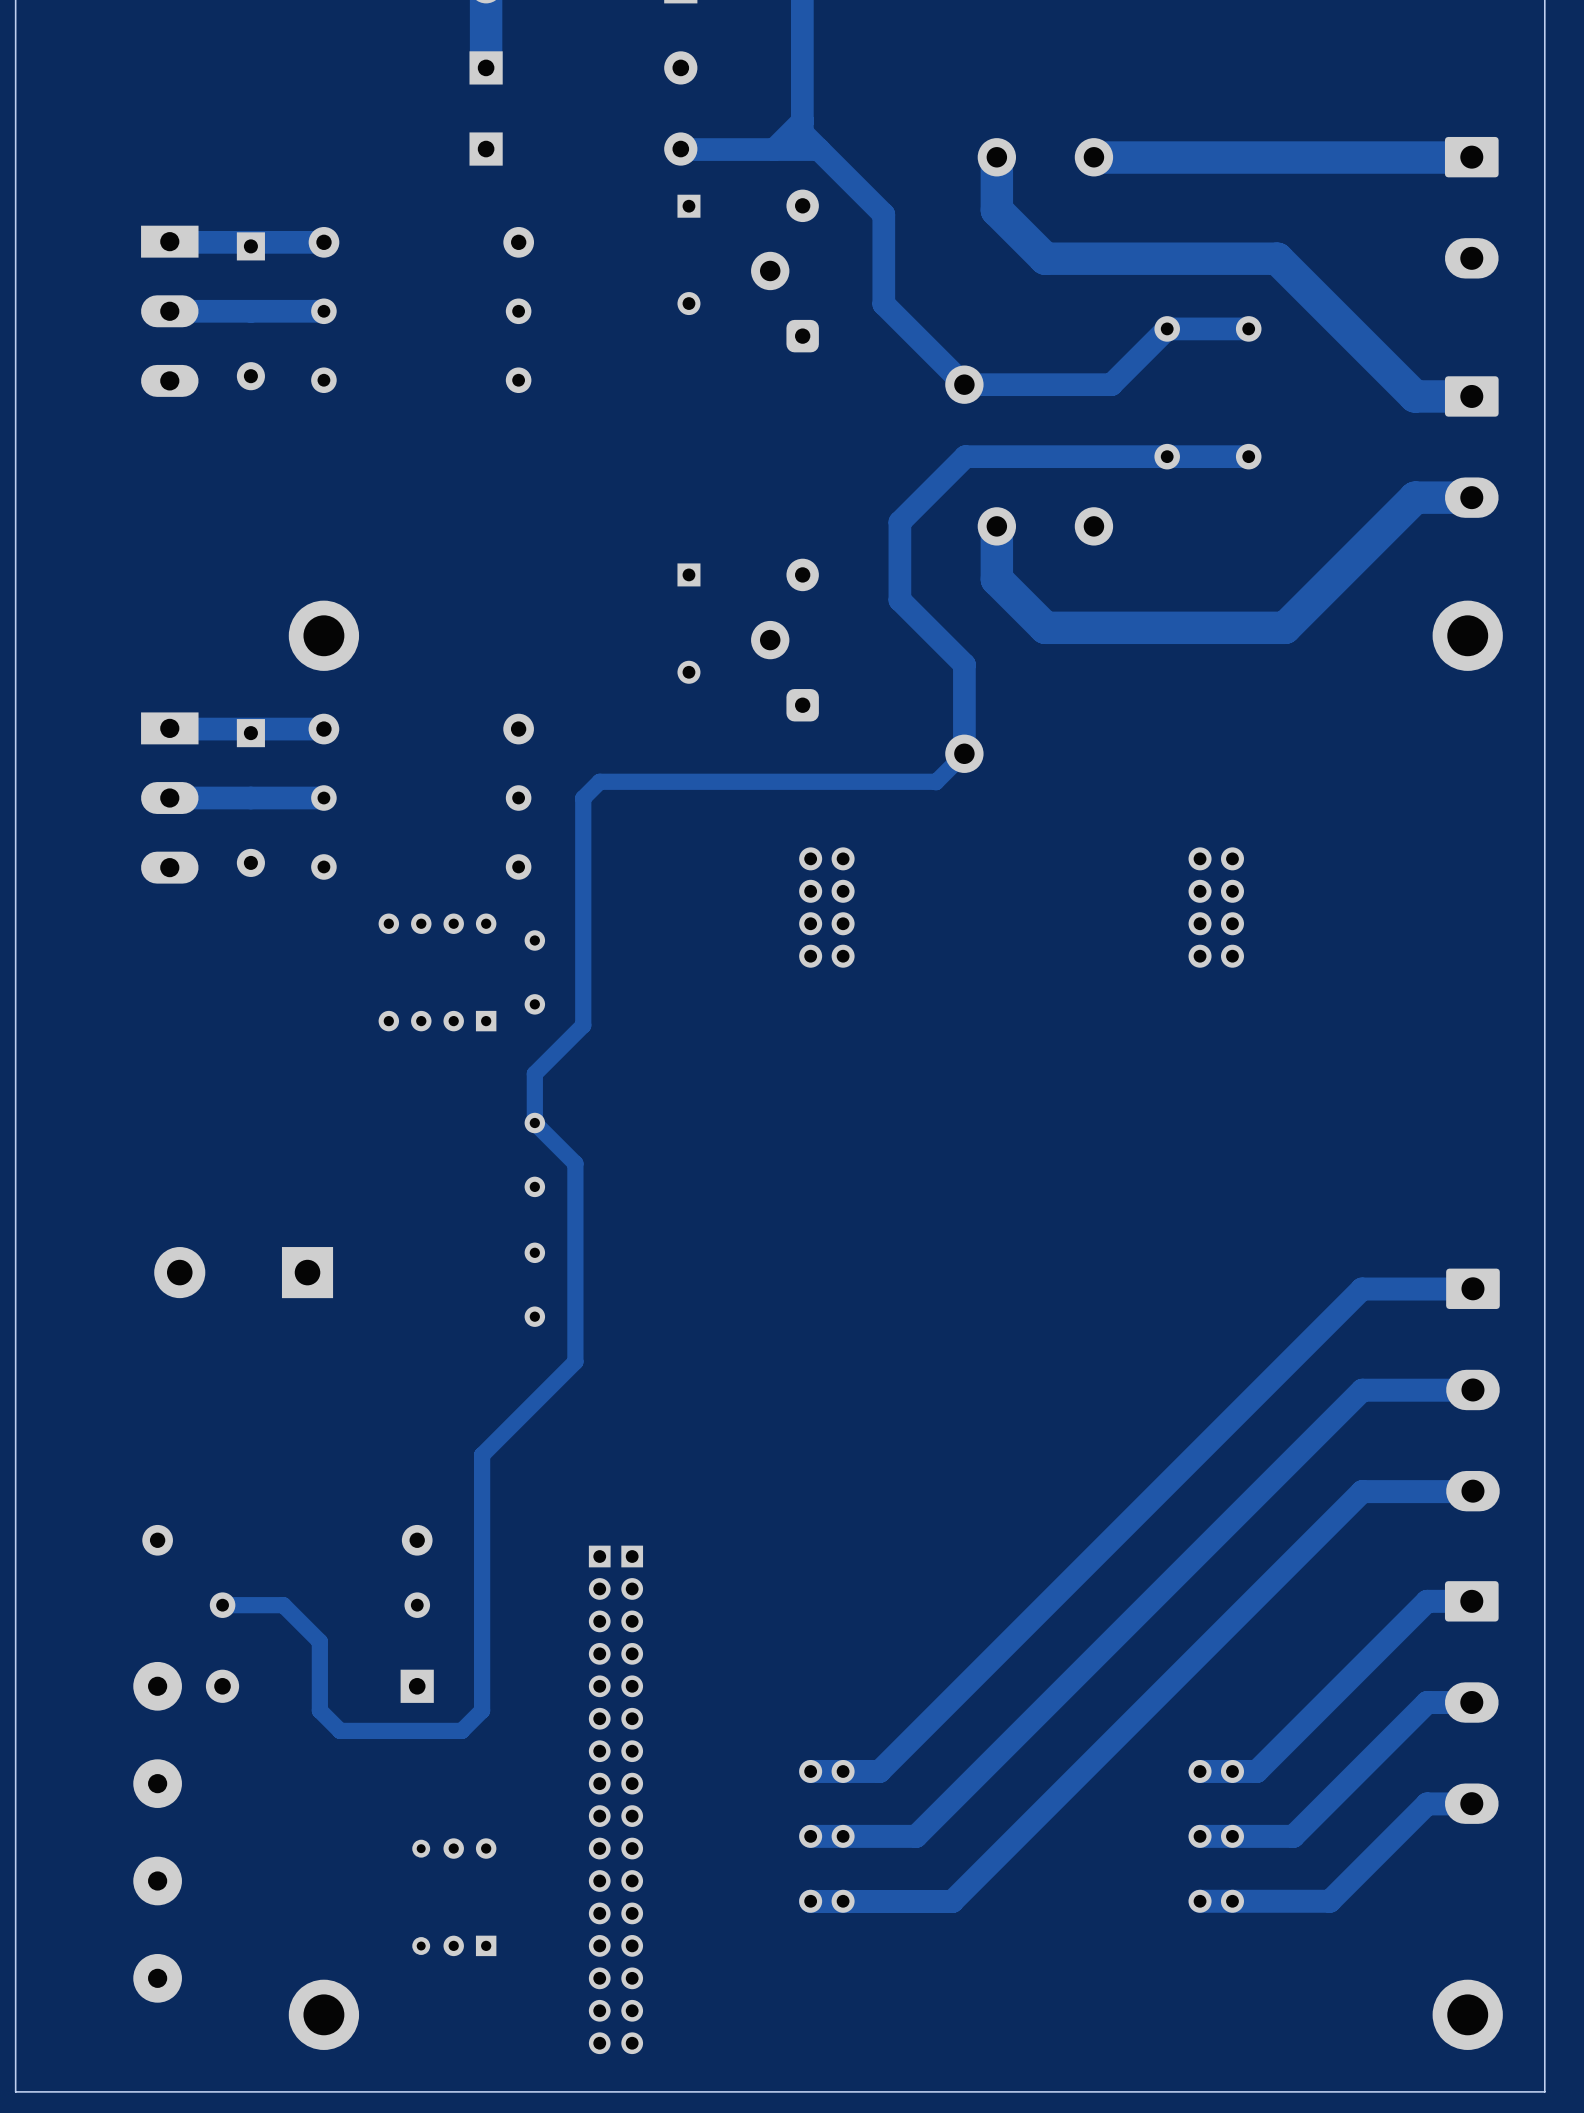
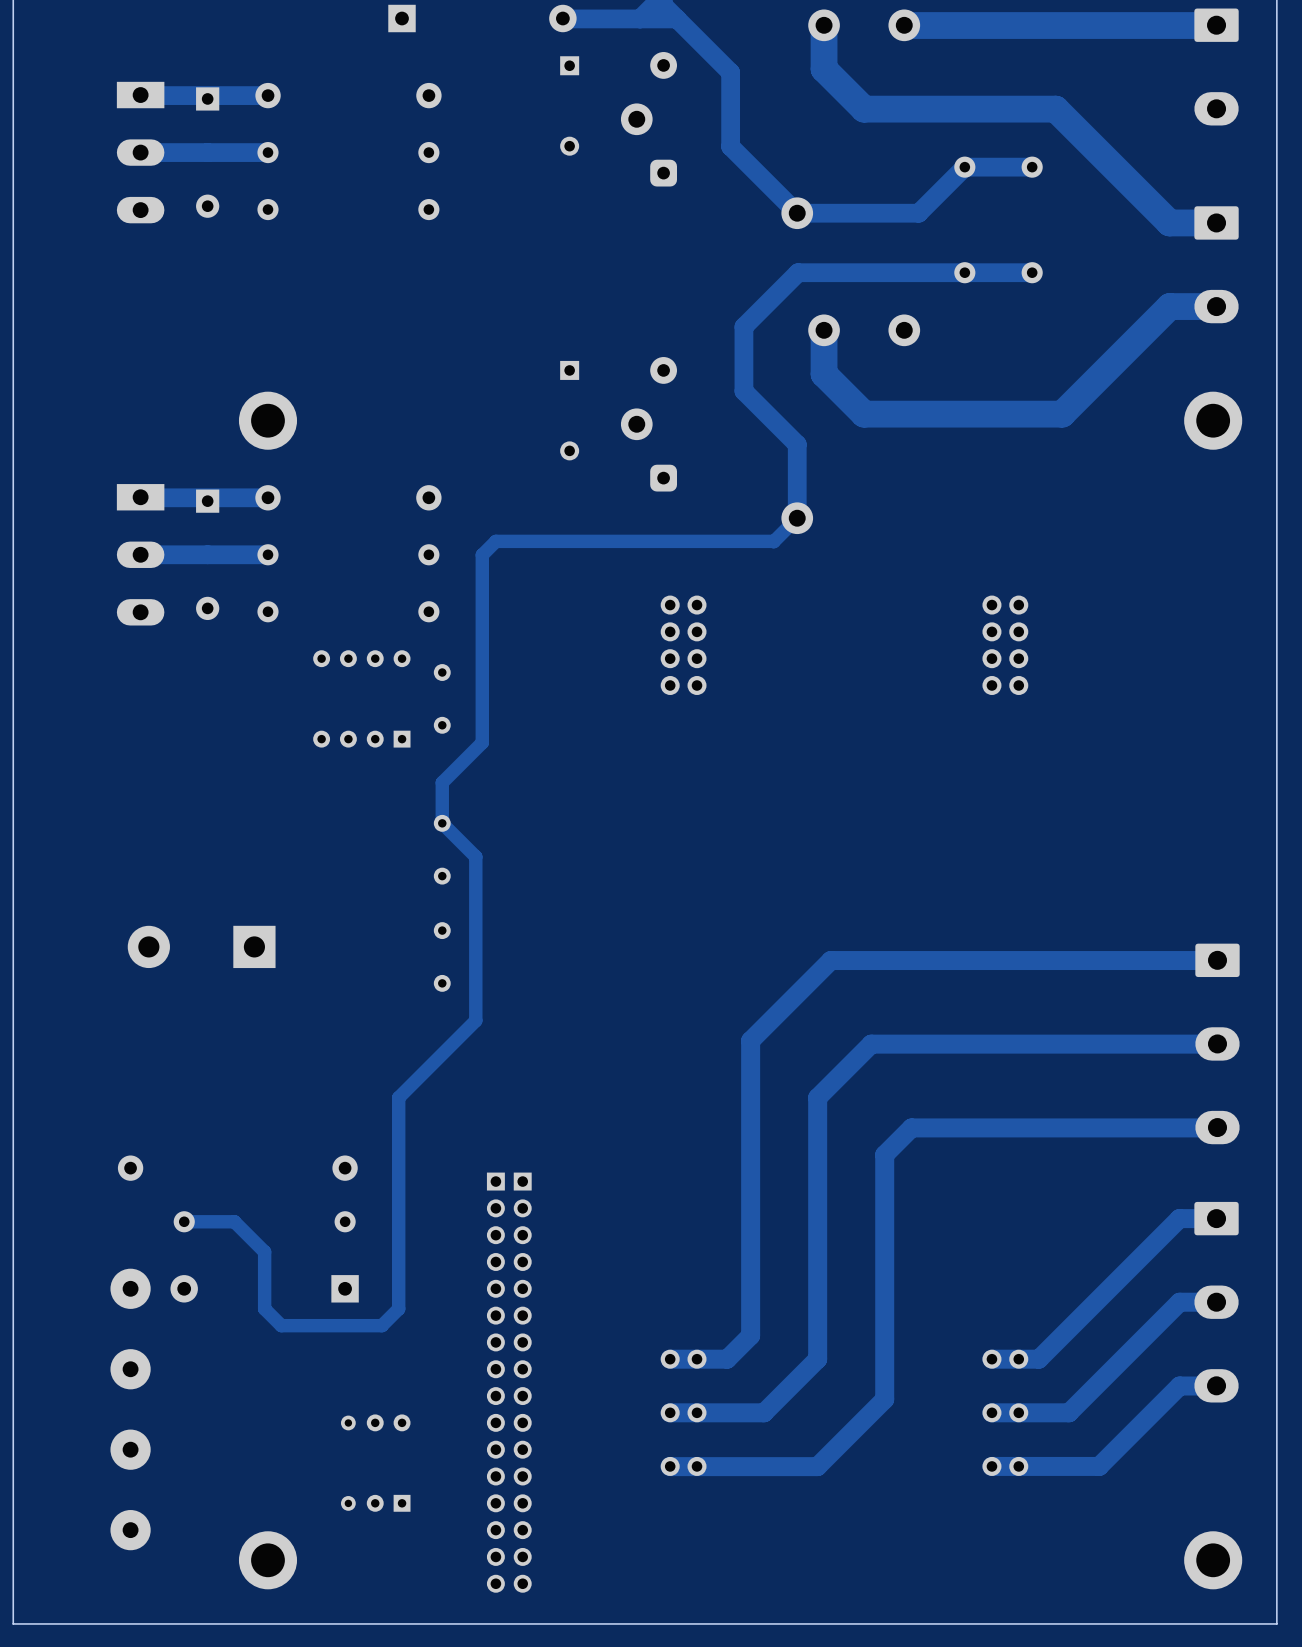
track: (1362, 1289) (908, 1743) -> (1125, 960) (830, 960) (750, 1040) (750, 1335)
track: (1362, 1390) (916, 1836) -> (1126, 1044) (871, 1044) (817, 1097) (817, 1359) (764, 1412) (757, 1412)
track: (1362, 1491) (952, 1901) -> (1126, 1127) (911, 1127) (884, 1154) (884, 1399) (817, 1466) (787, 1466)

